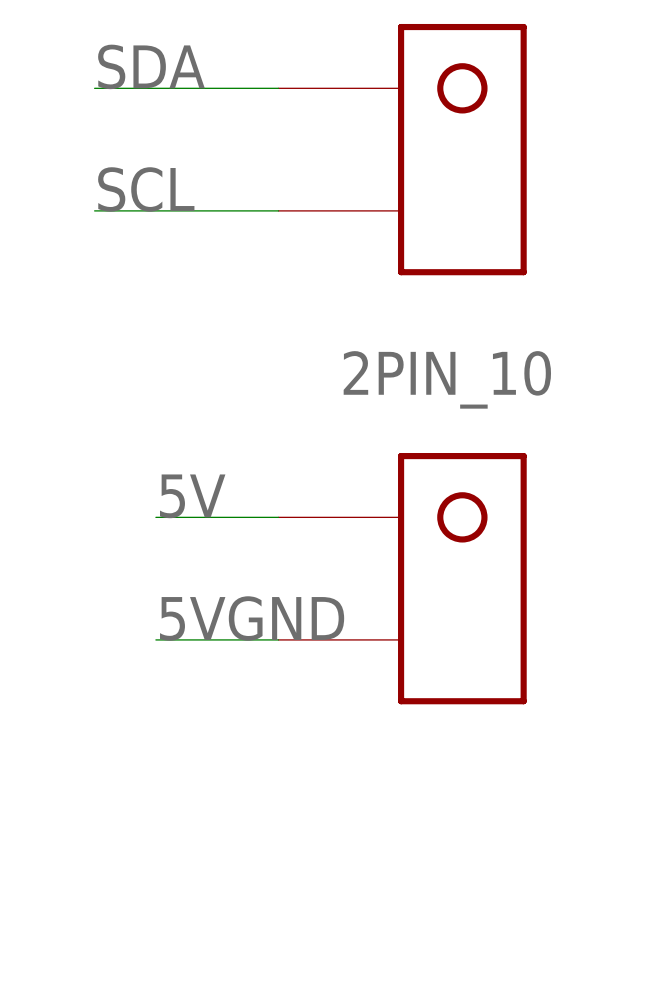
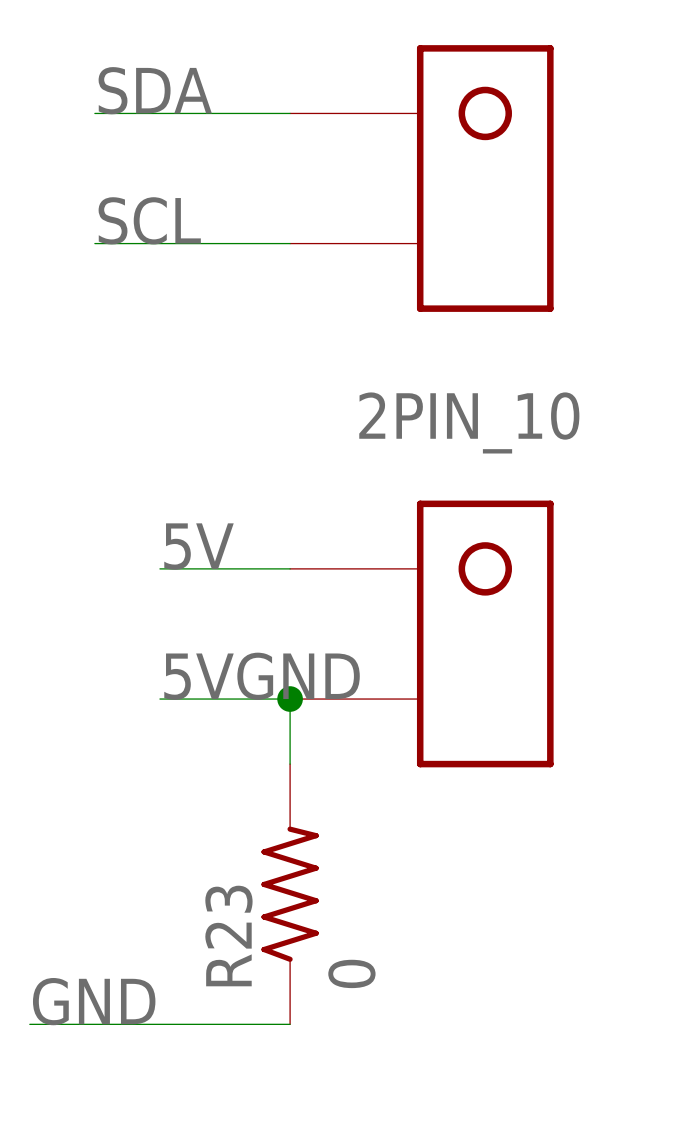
wire: none -> (290, 699) (290, 764)
junction: none -> (290, 699)
R23: none -> 0 (290, 894)
label: none -> GND (94, 1001)
wire: none -> (29, 1024) (290, 1024)

